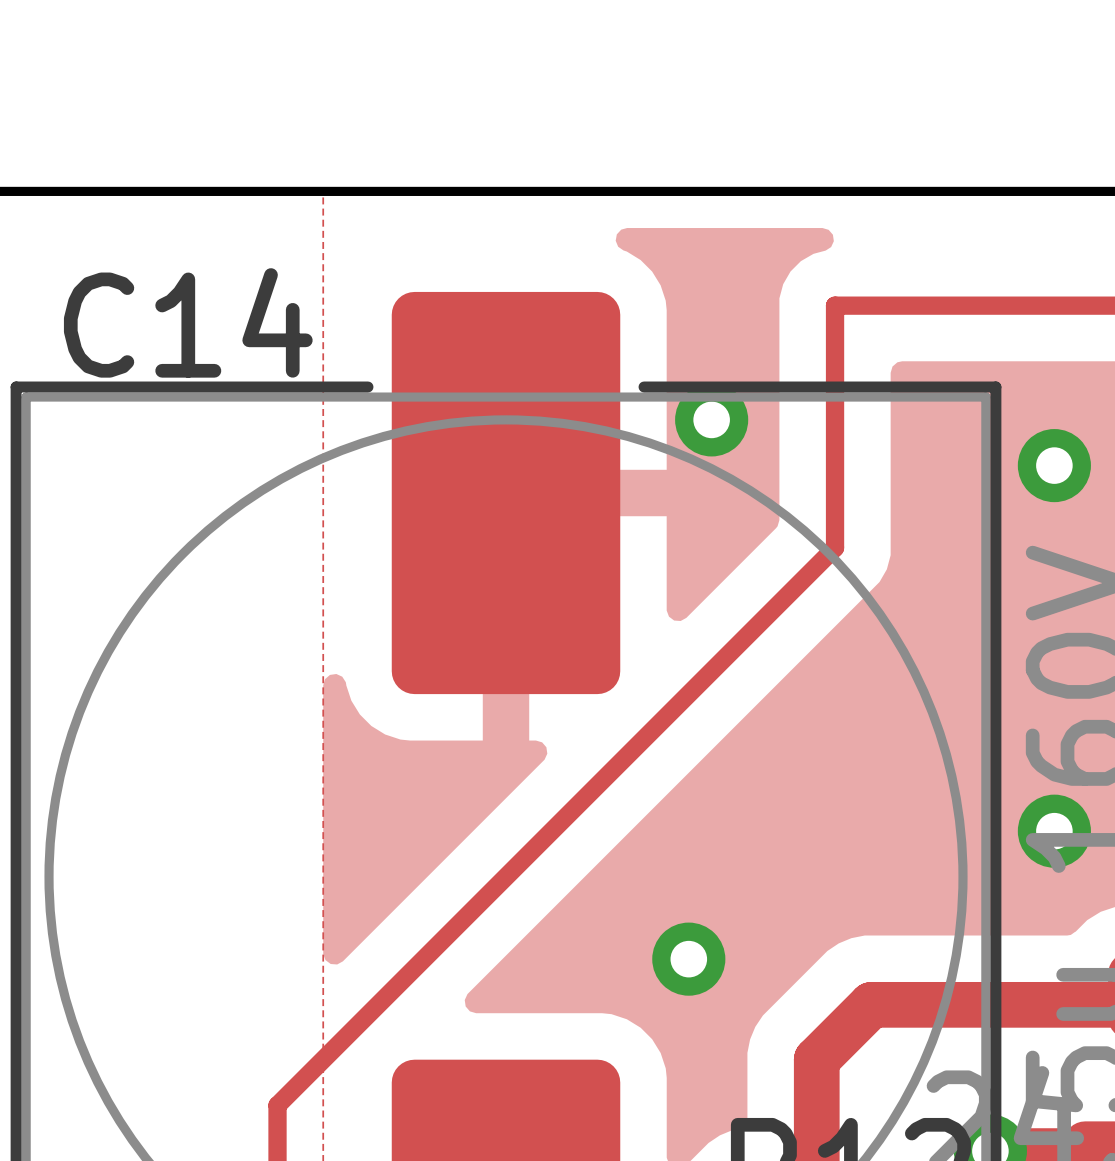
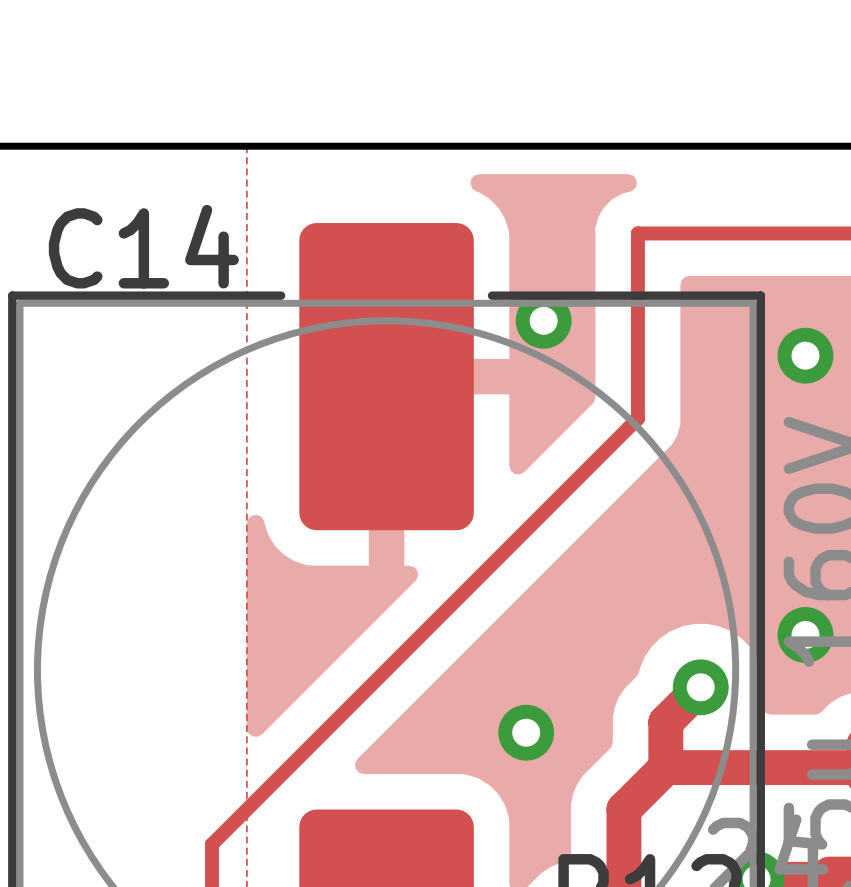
track: none -> (700, 687) (665, 722) (665, 767)
via: none -> (700, 687)

